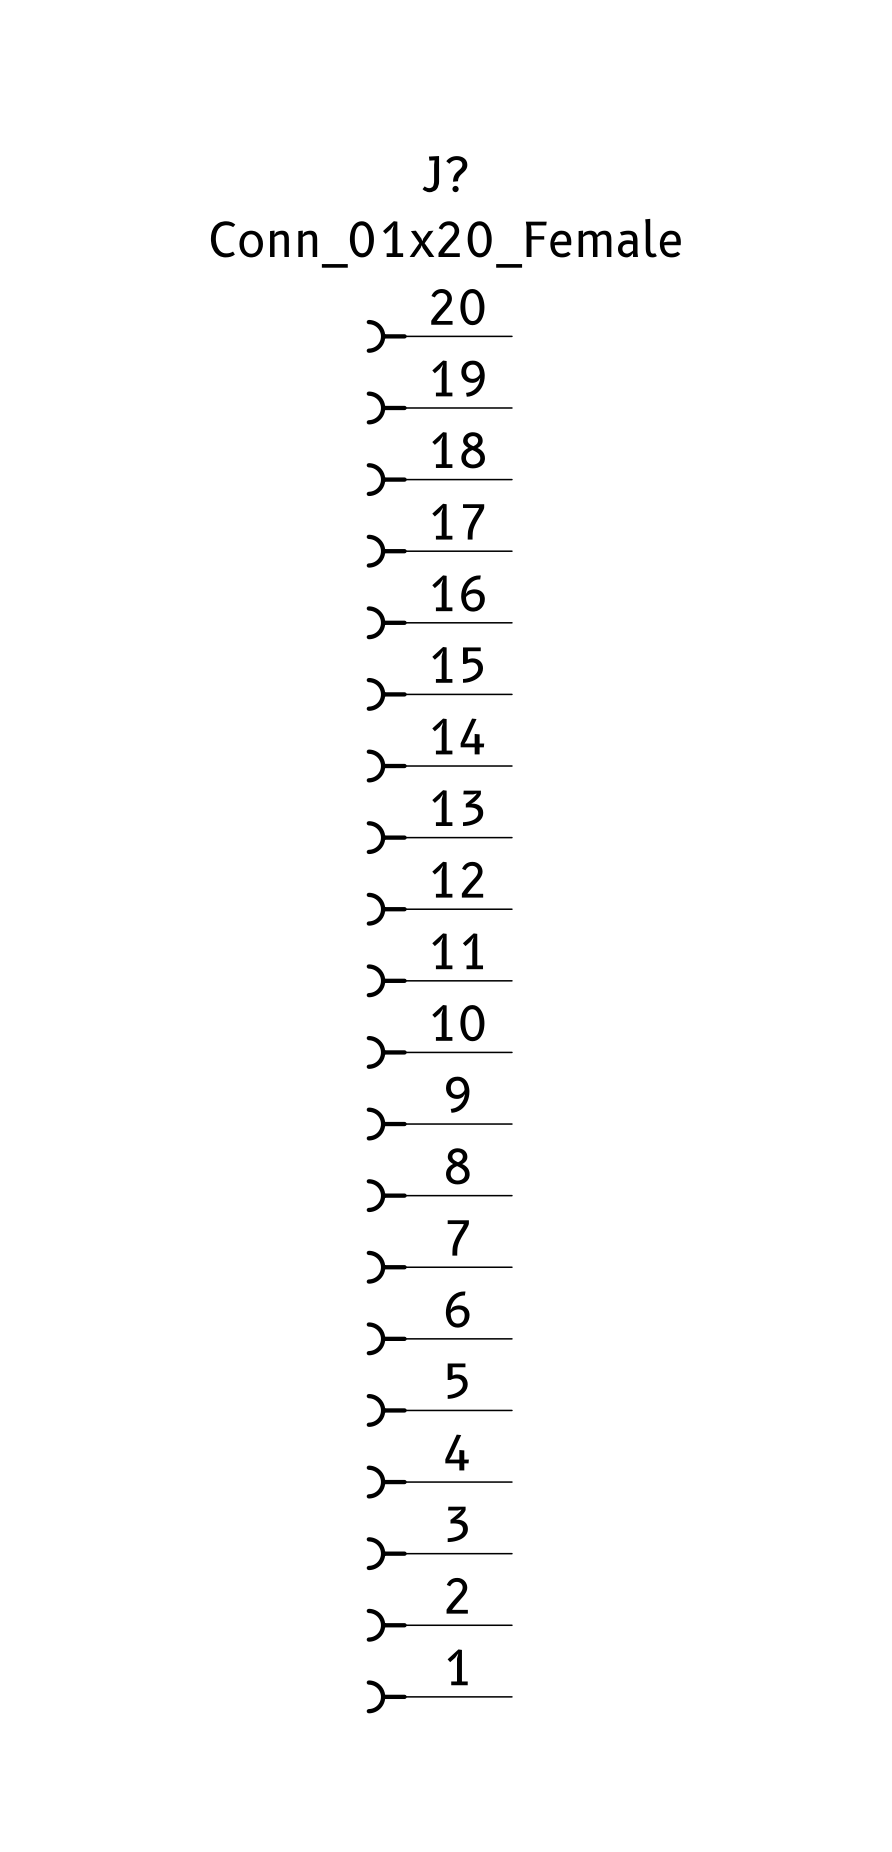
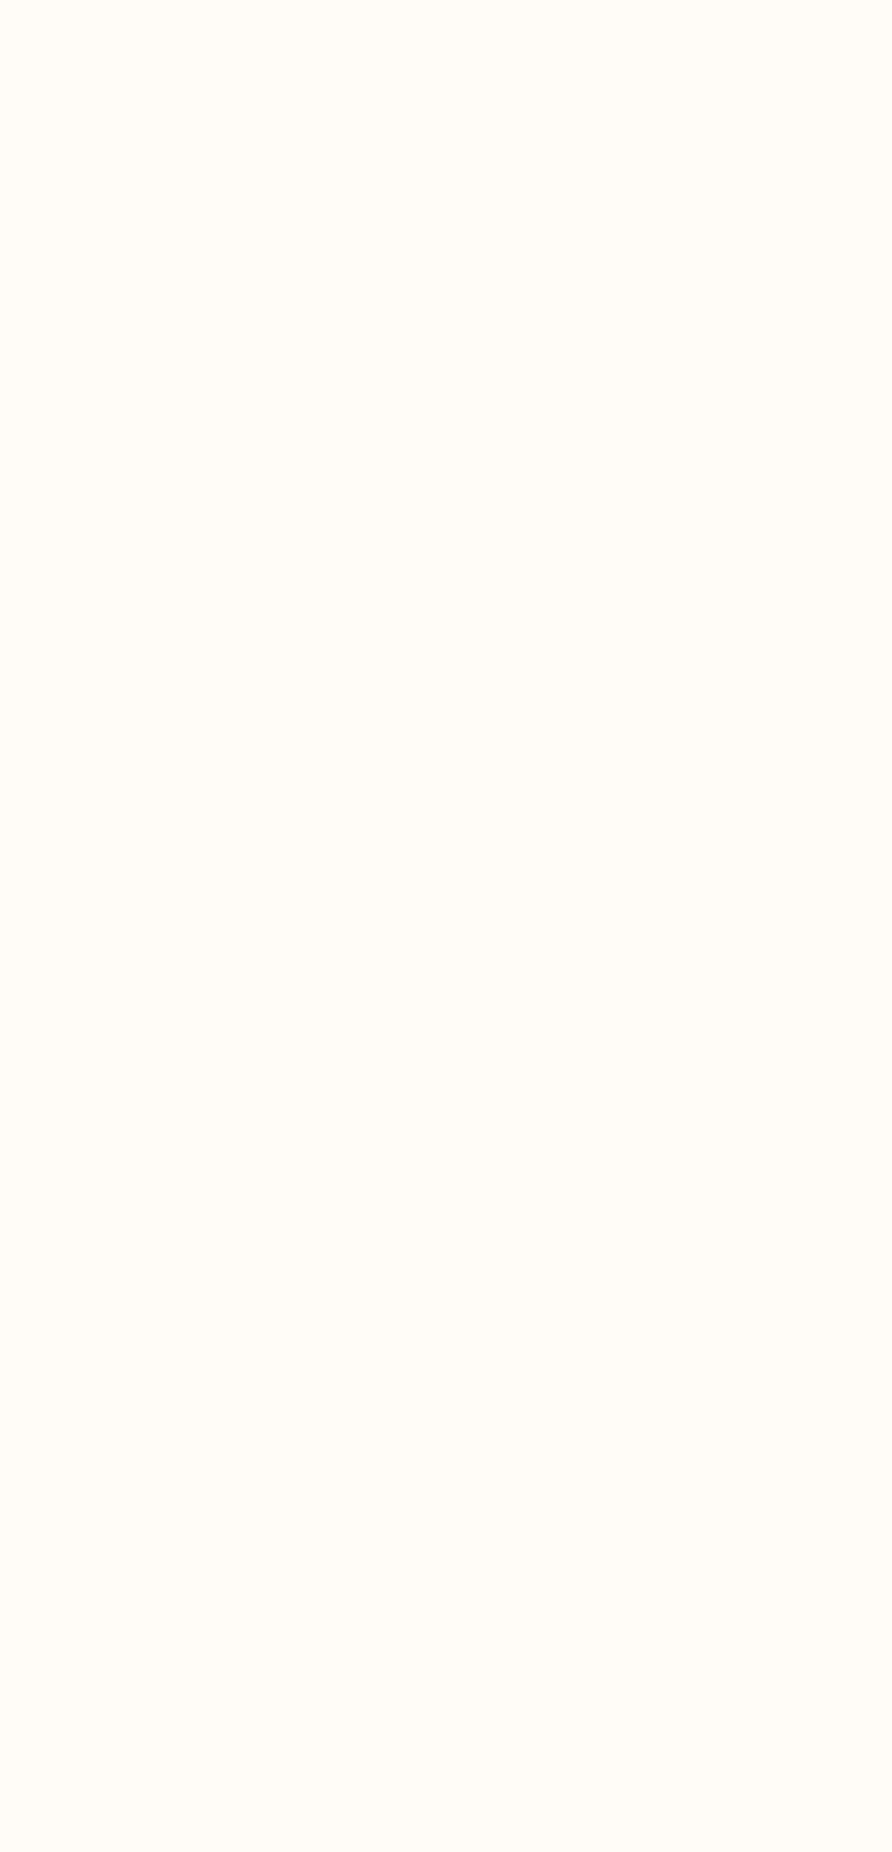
J?: Conn_01x20_Female (439, 1016) -> none

